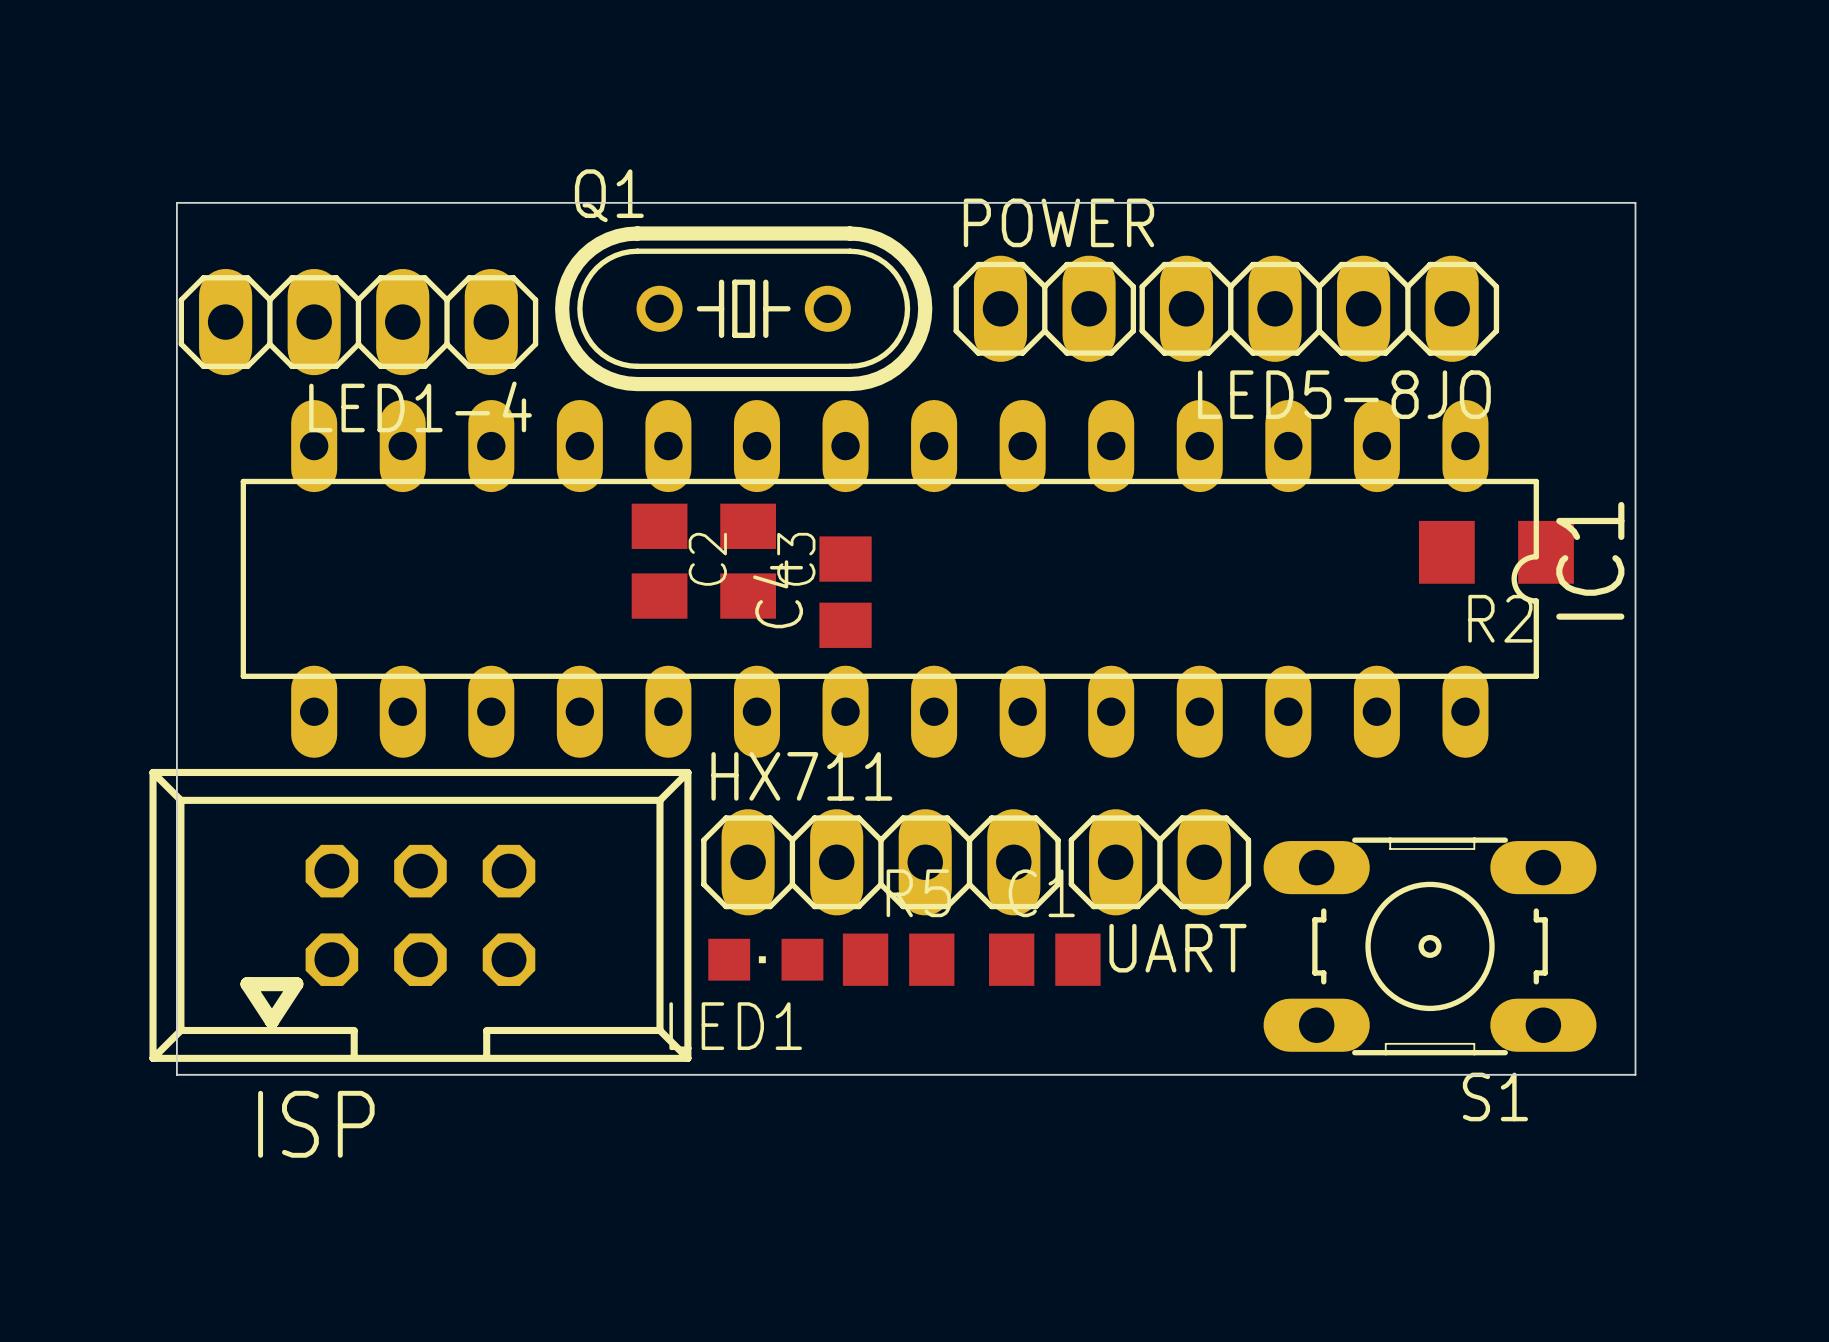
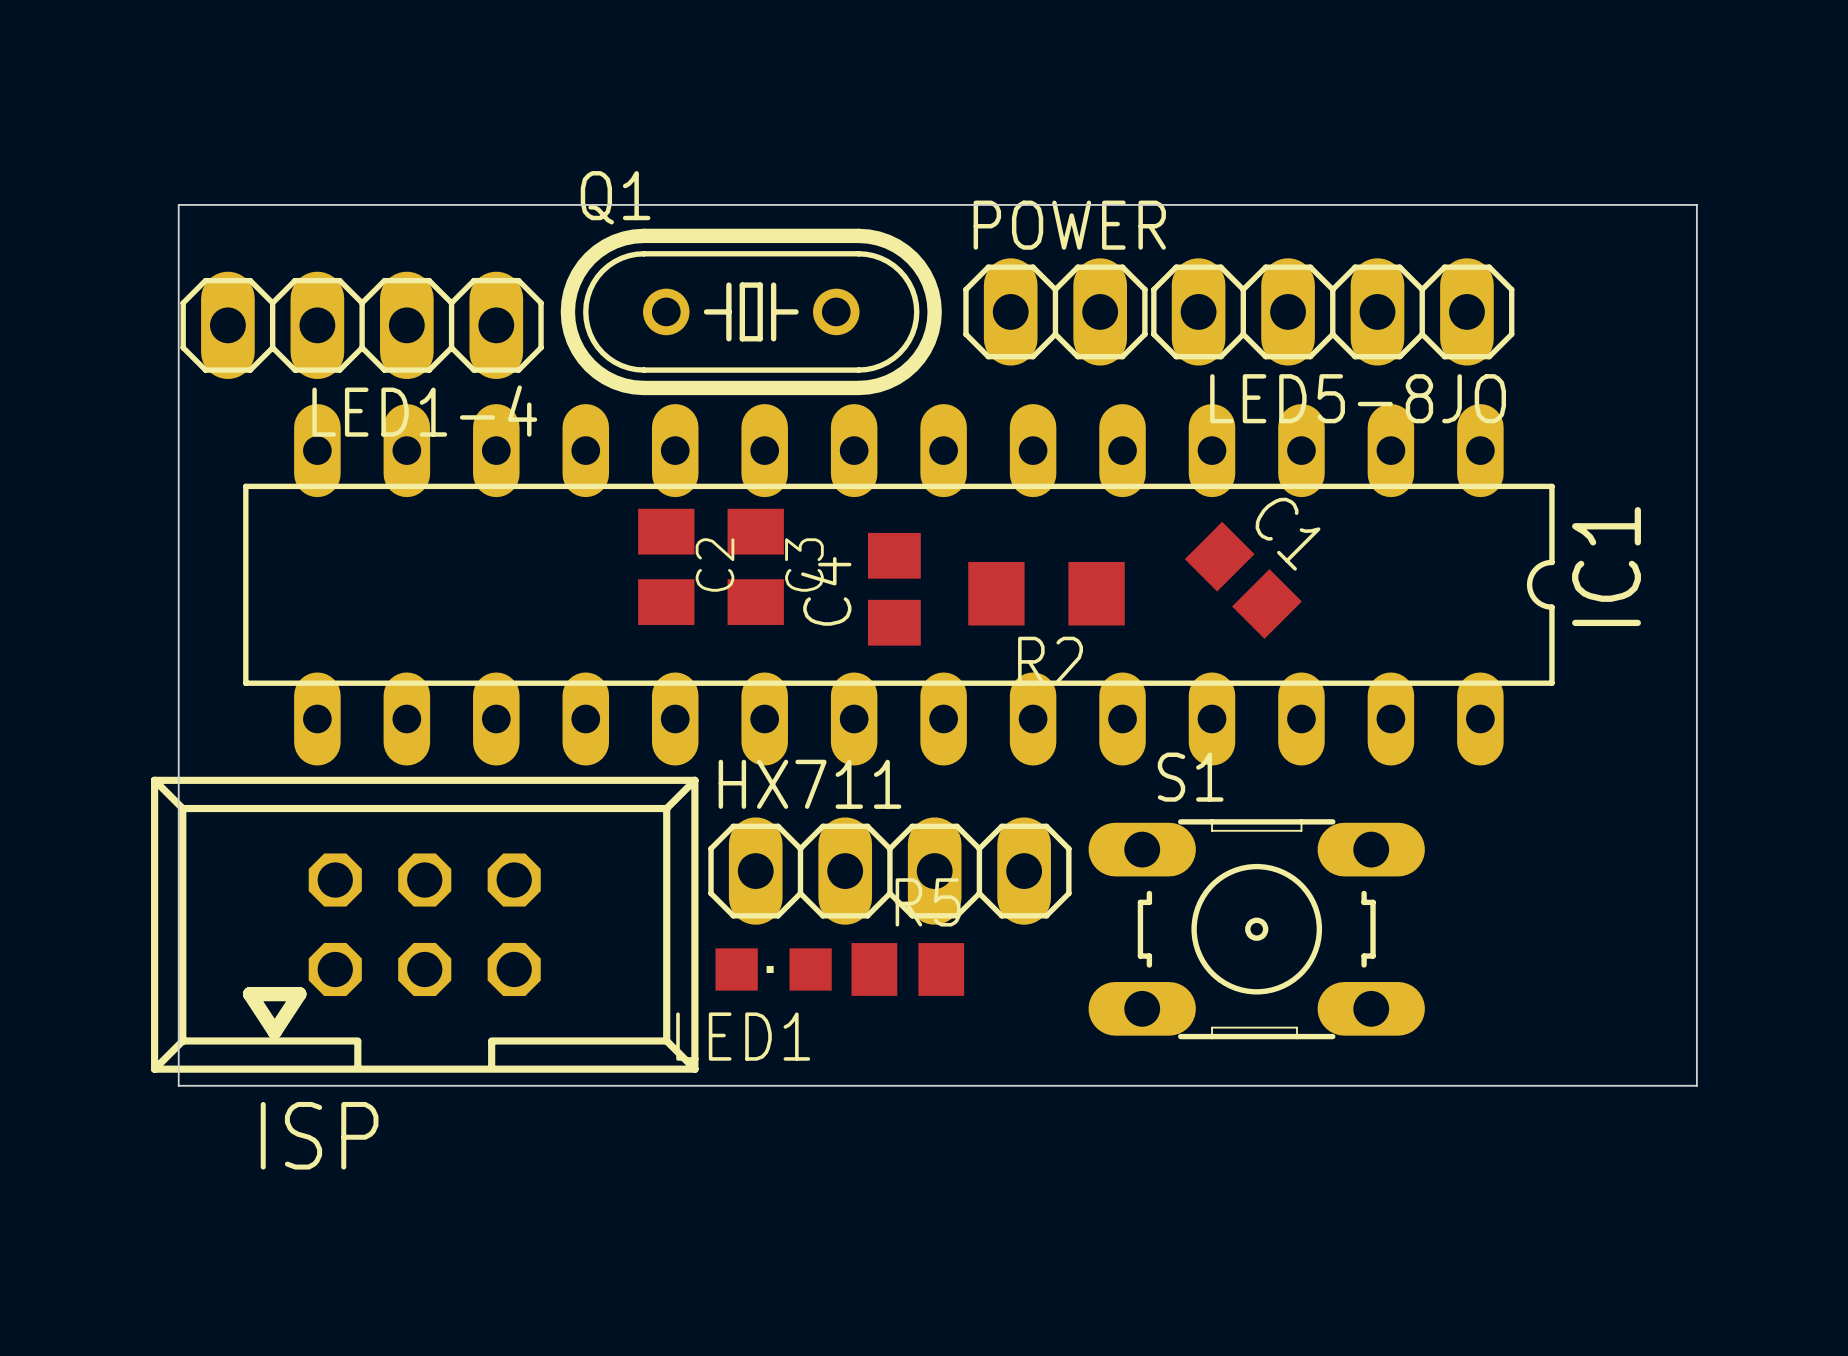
board edge: (1635, 202) (1635, 1074) -> (1652, 204) (1696, 204) (1696, 1085) (1652, 1085)
R2 position: (1496, 552) -> (1046, 593)
C4 position: (845, 592) -> (894, 589)
UART: (1159, 862) -> none
S1 rotation: 0° (1430, 946) -> 180° (1256, 929)
C1 rotation: 0° (1044, 959) -> 45° clockwise (1243, 580)
C1 position: (1044, 959) -> (1243, 580)

